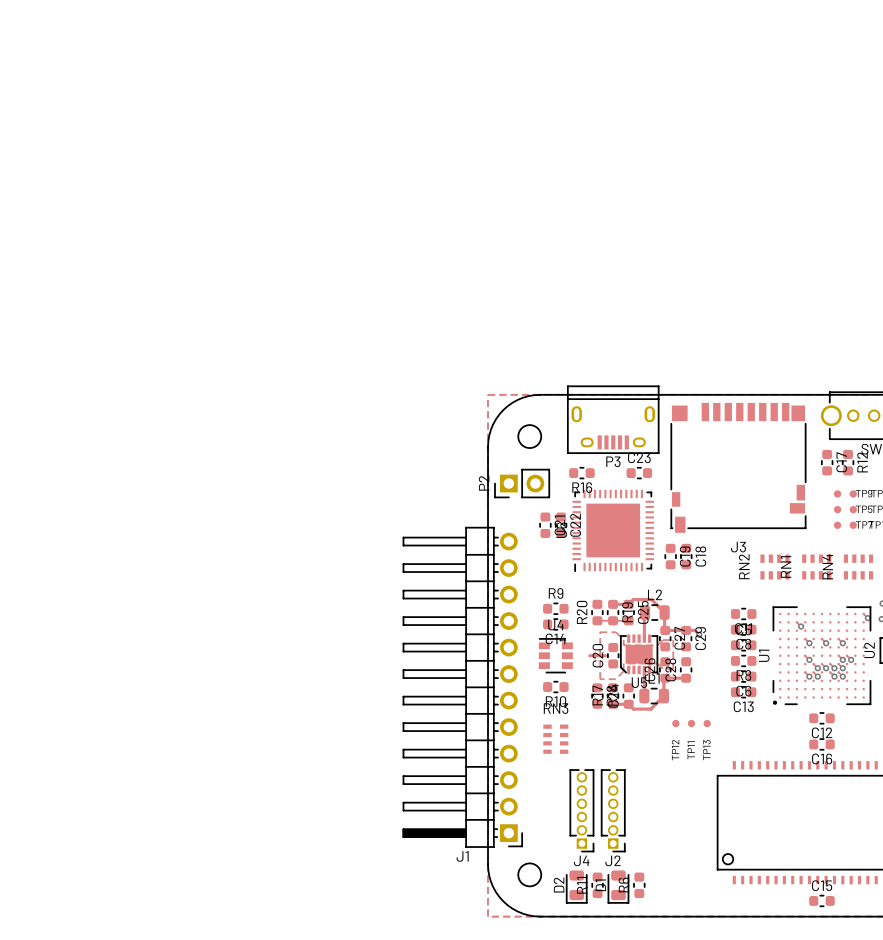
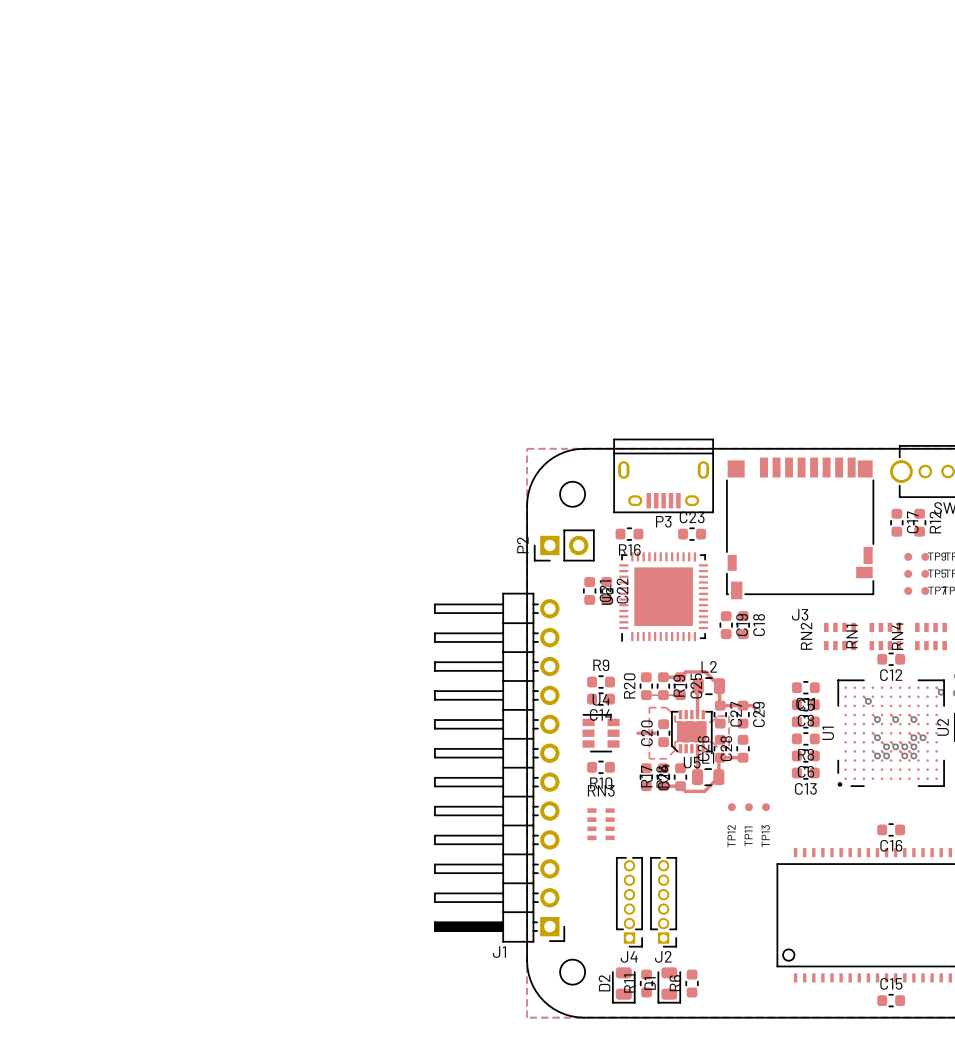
C12 position: (821, 718) -> (891, 659)

